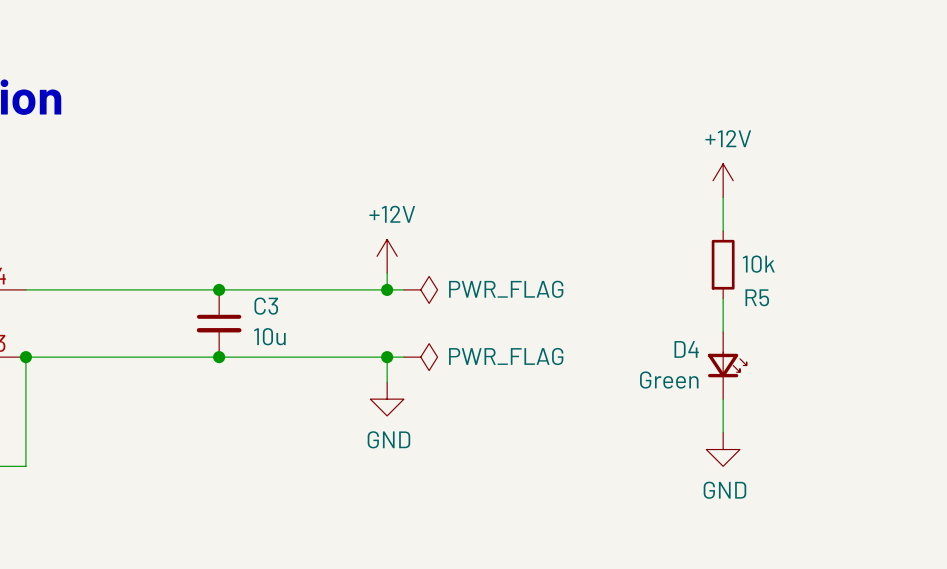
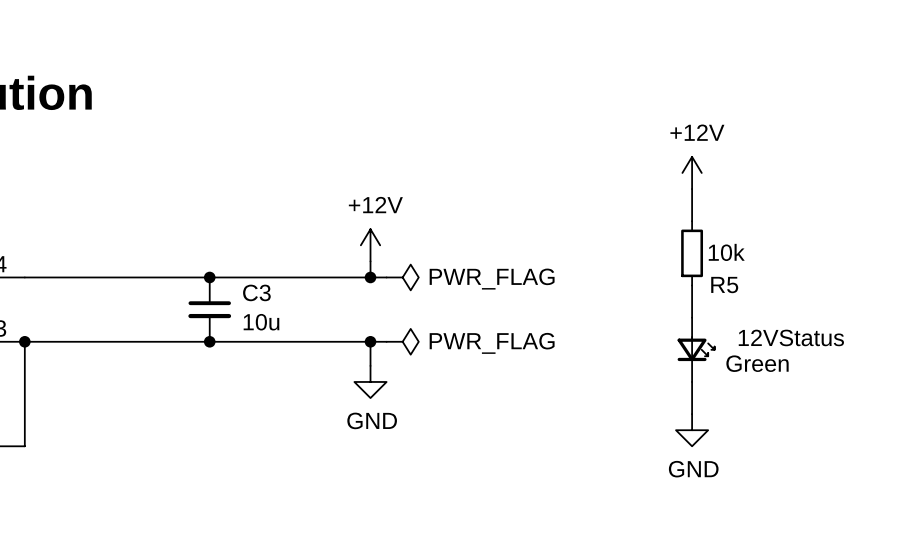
D4 name: D4 (686, 349) -> 12VStatus (791, 337)
D4 value position: Green (669, 380) -> Green (757, 363)

